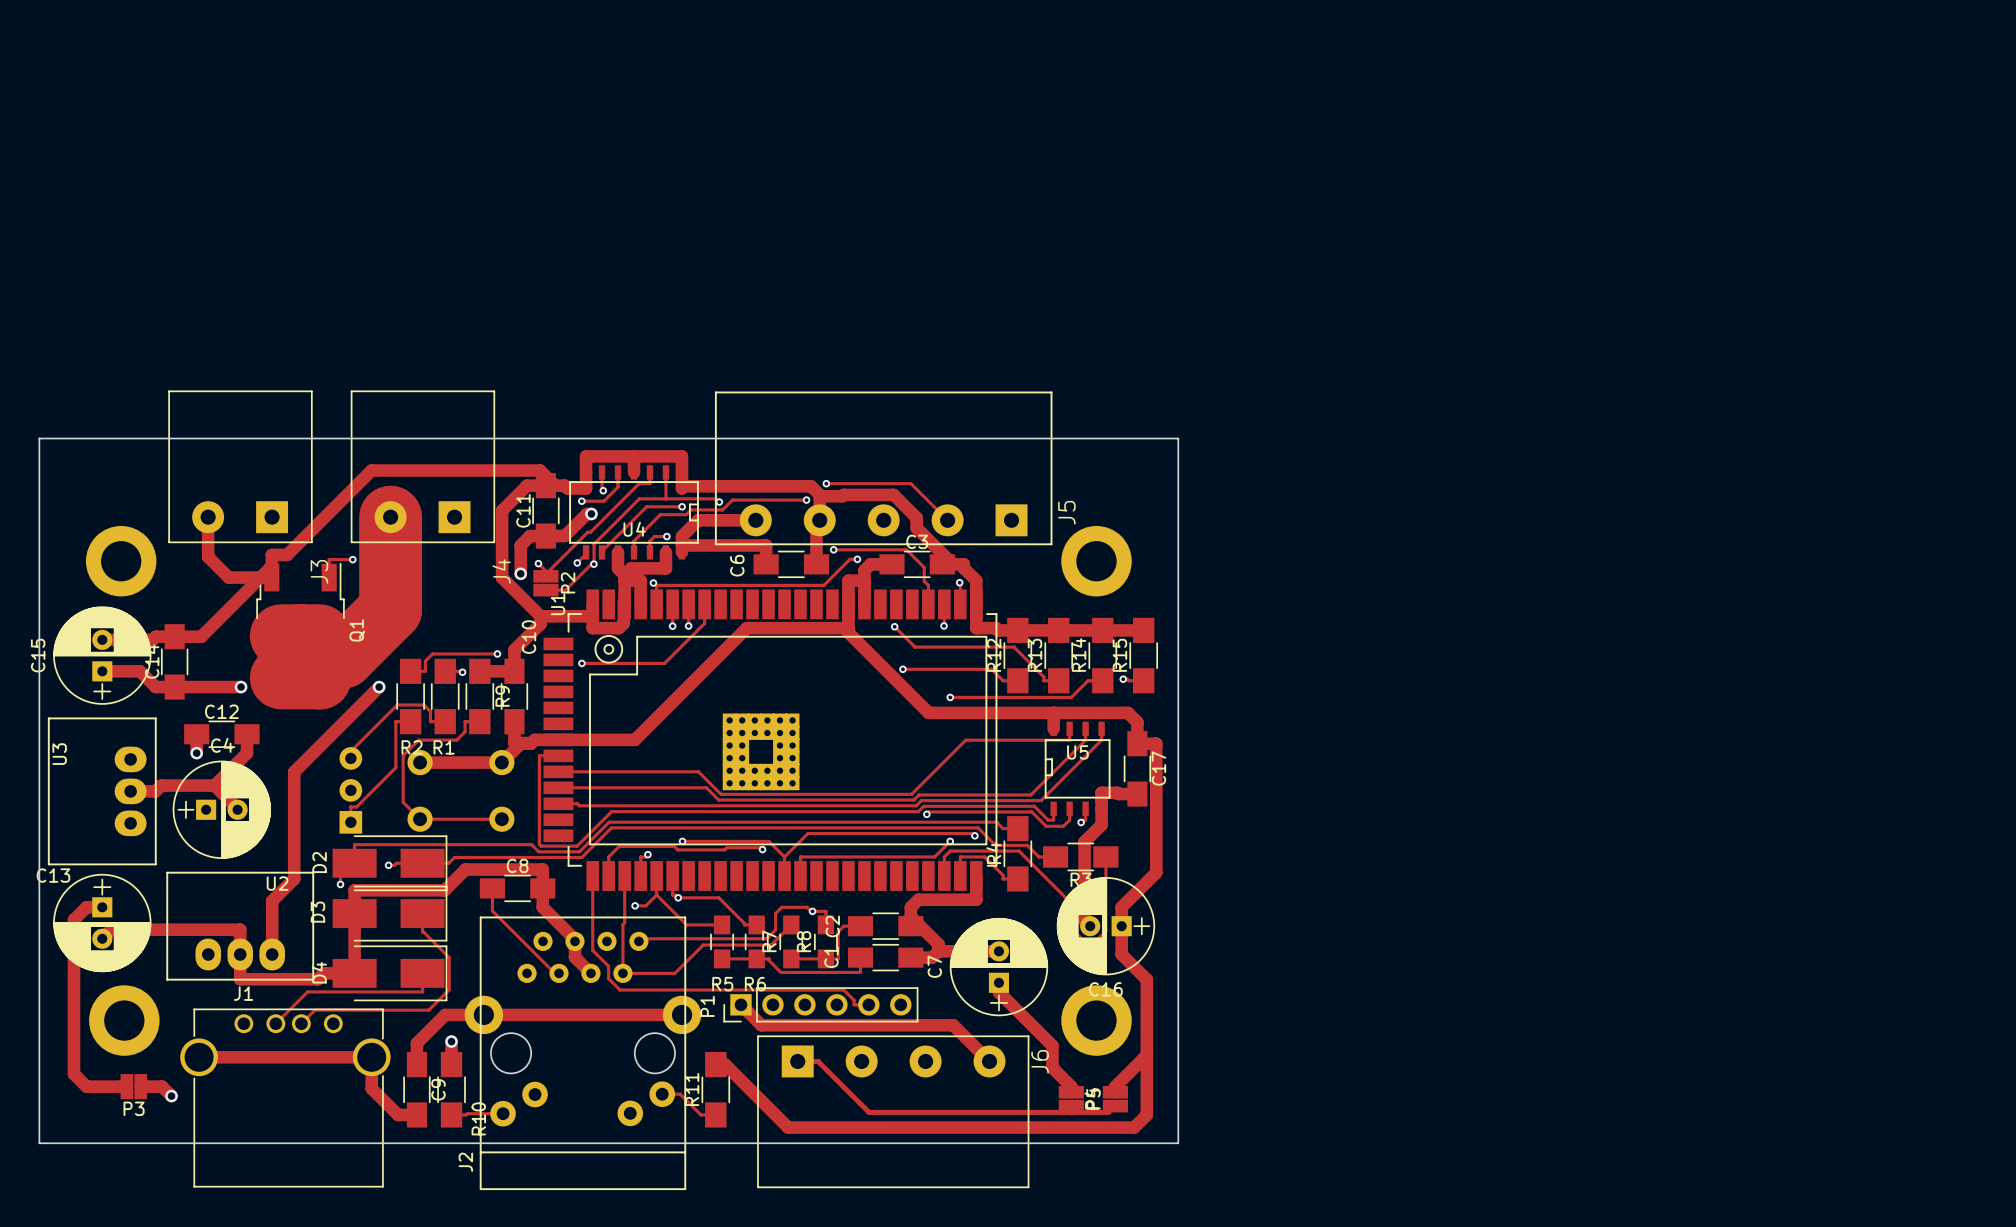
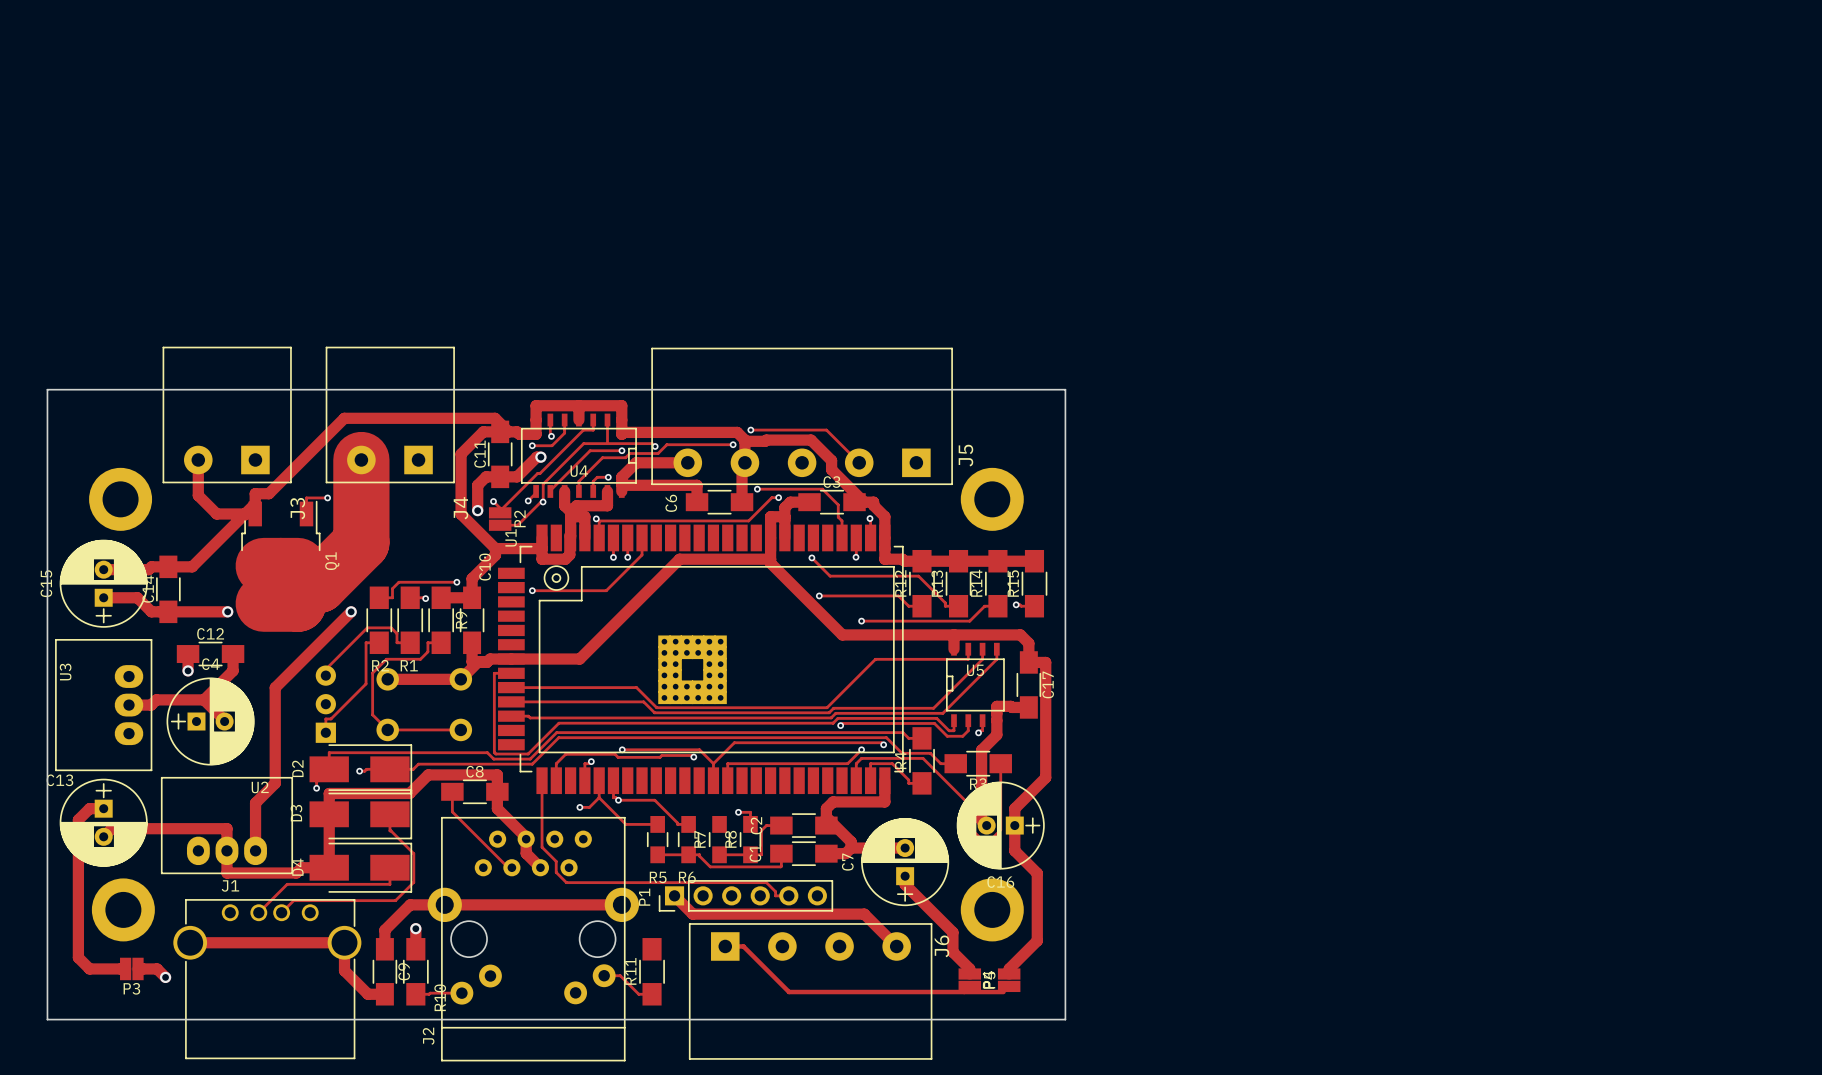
track: (624, 875) (622, 973) (674, 973) (703, 945) (771, 945) (791, 924) -> none
track: (812, 911) (807, 907) (781, 907) (775, 913) (775, 929) (766, 938) (641, 938) (638, 941) -> none
track: (1146, 1055) (1146, 1114) (1134, 1127) (788, 1127) (725, 1064) (715, 1064) -> none

